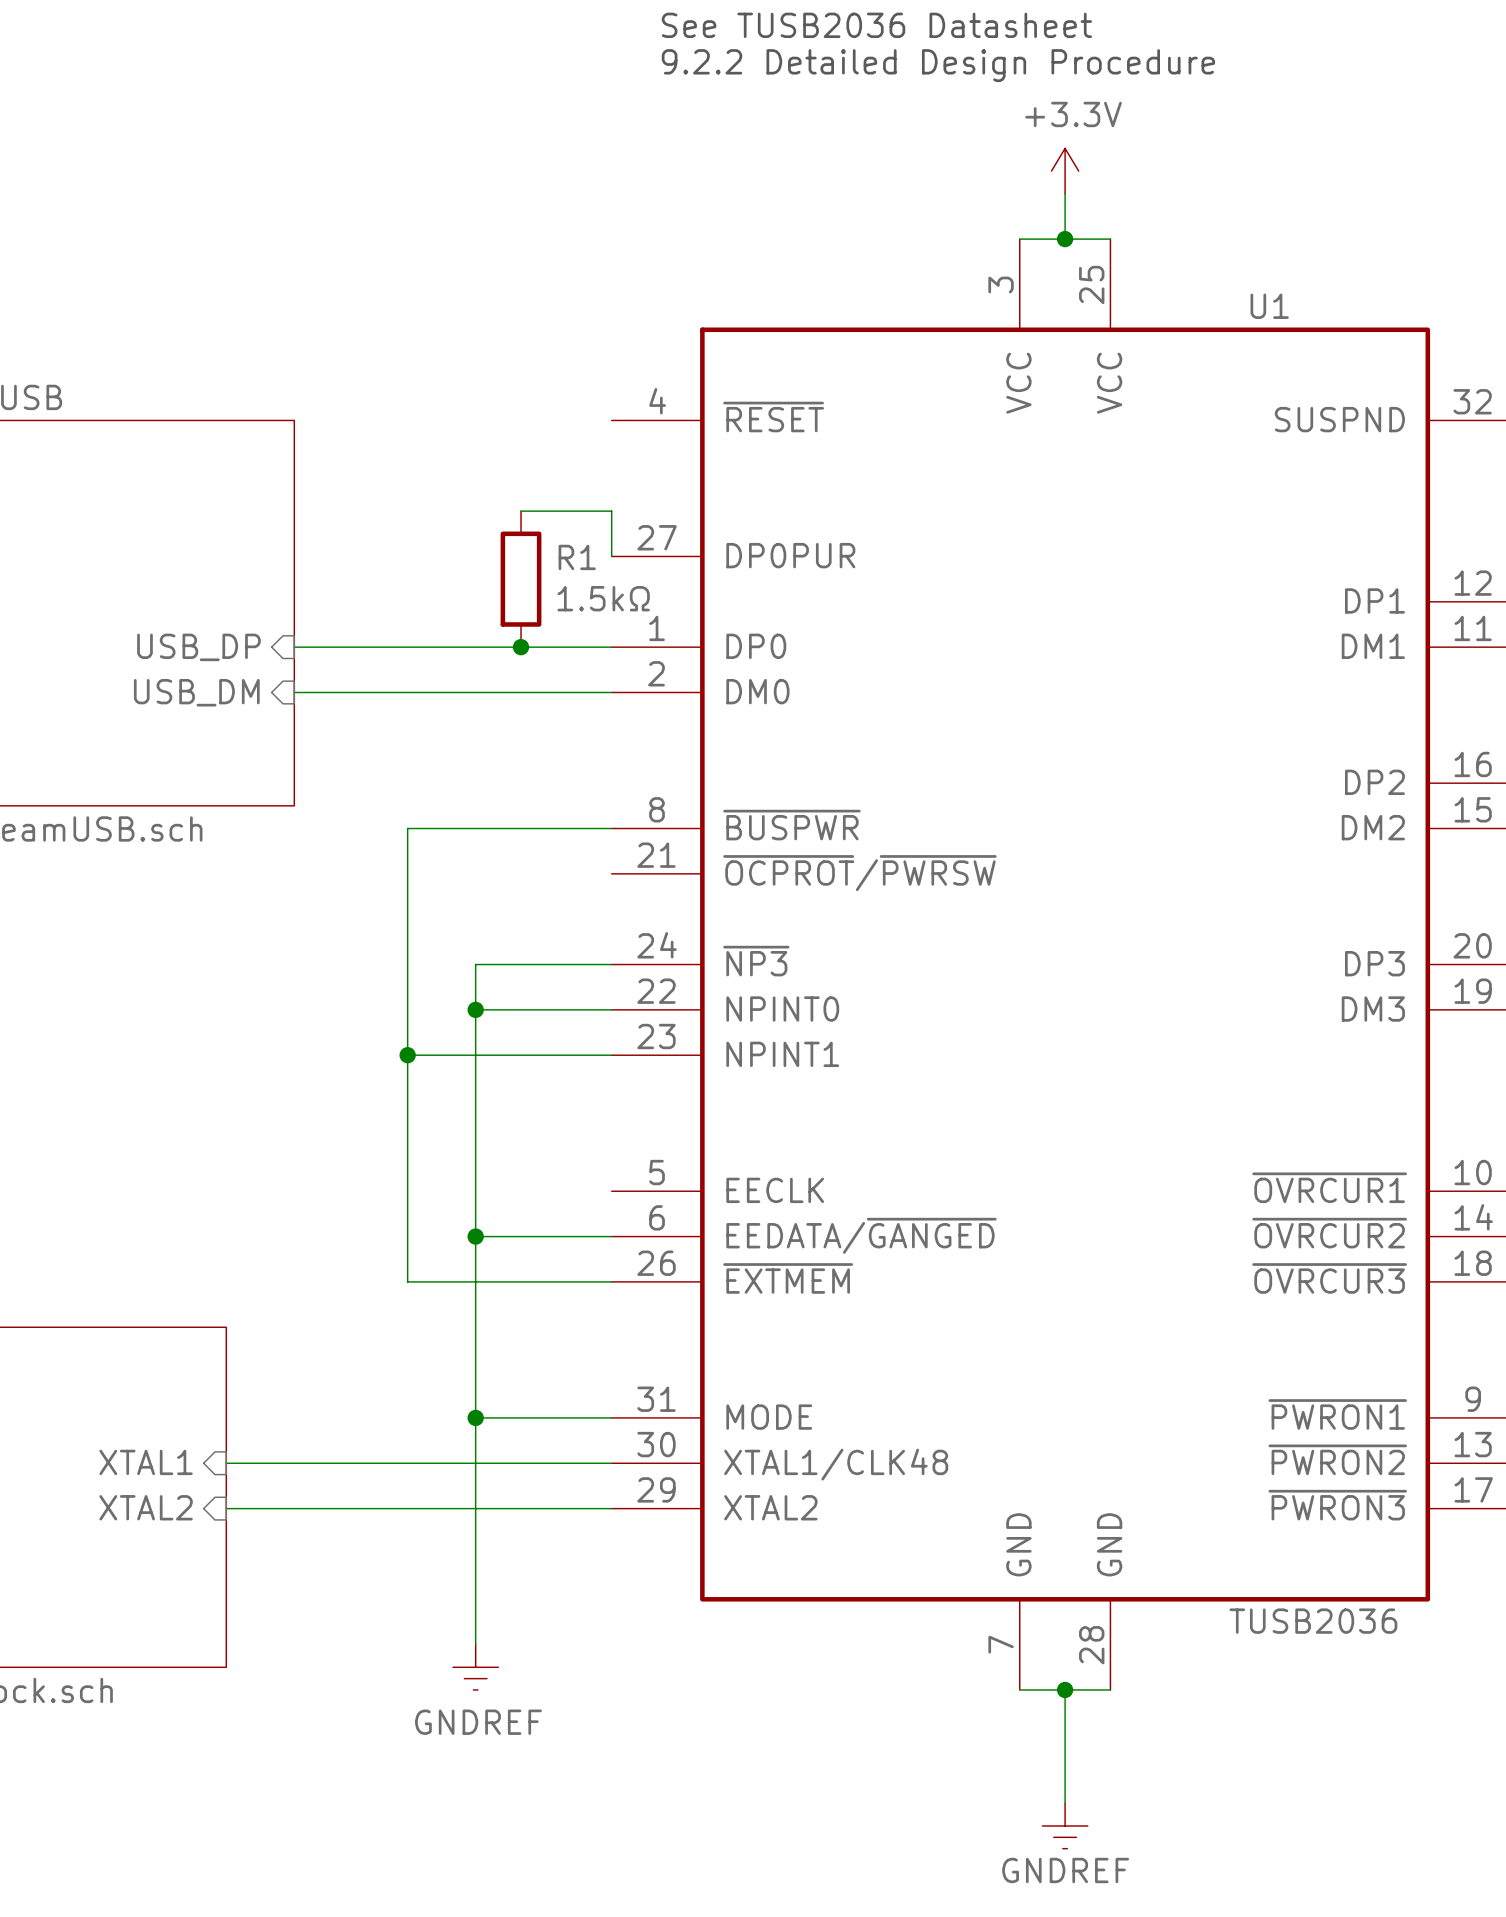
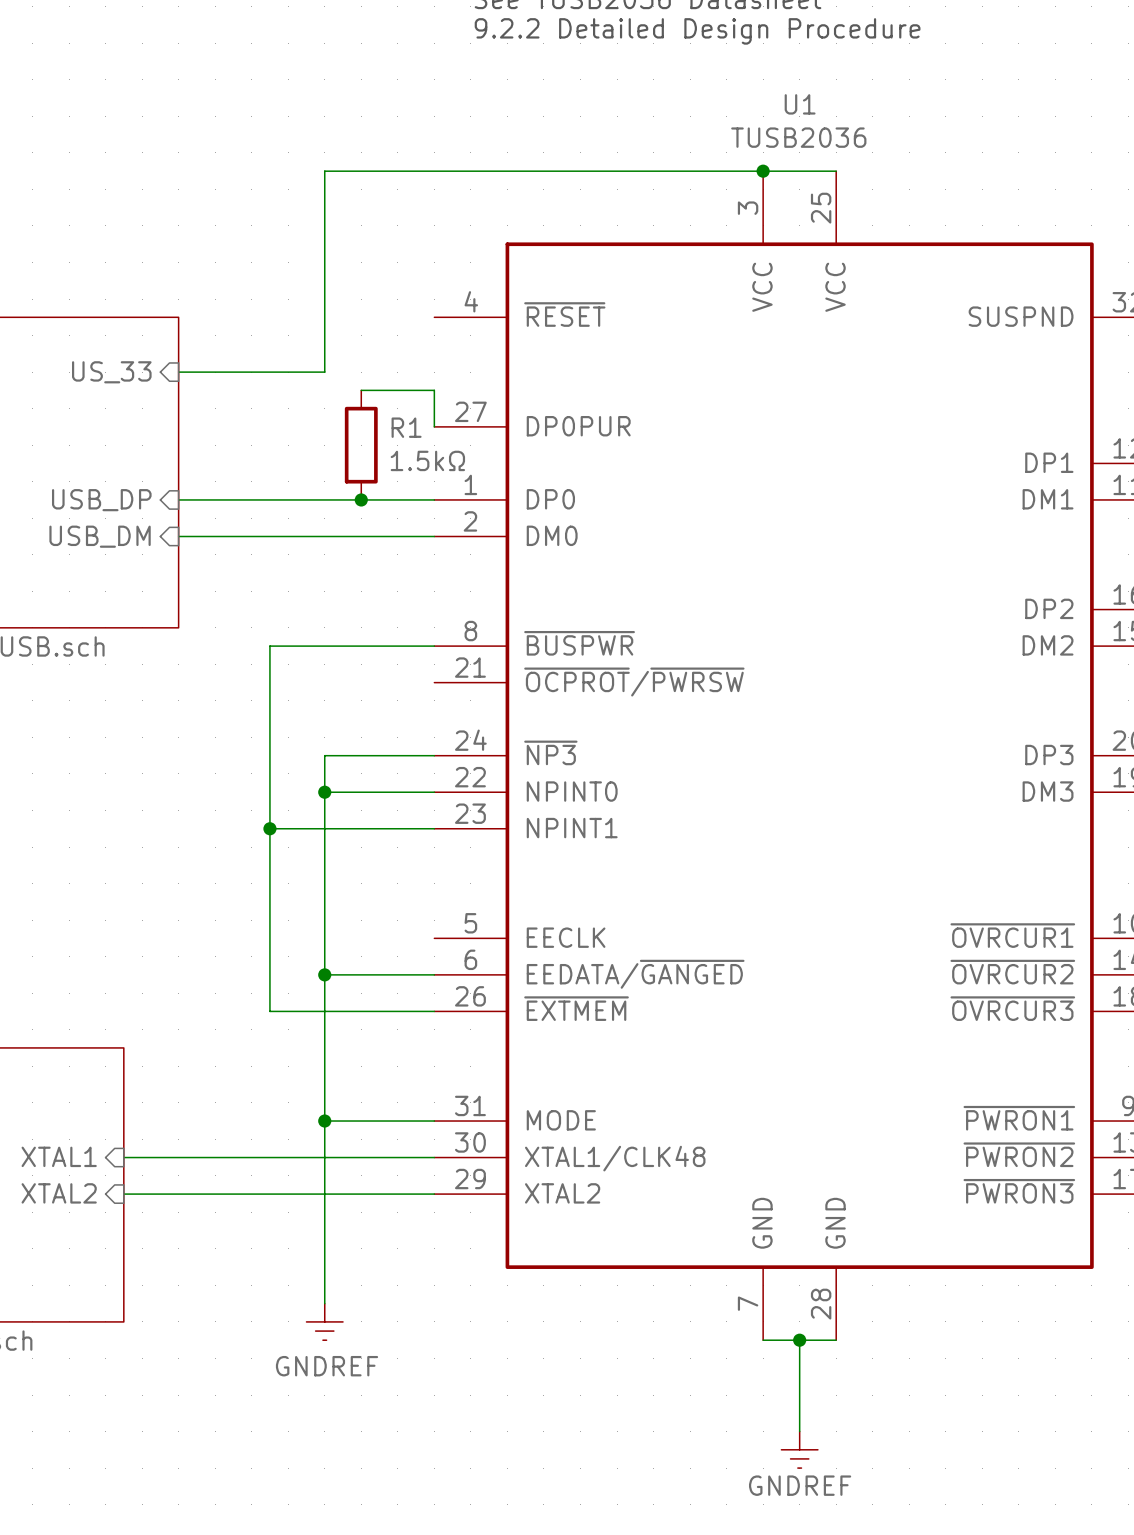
power symbol: +3.3V (1065, 171) -> none
wire: (1065, 193) (1065, 239) -> none
wire: none -> (763, 171) (324, 171) (324, 372) (178, 372)
junction position: (1065, 239) -> (763, 171)
U1 name position: U1 (1269, 306) -> U1 (800, 104)
sheet pin: none -> US_33 (111, 372)
U1 value position: TUSB2036 (1313, 1621) -> TUSB2036 (798, 137)

